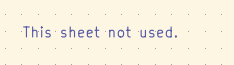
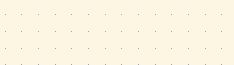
text: This sheet not used. (99, 31) -> none

